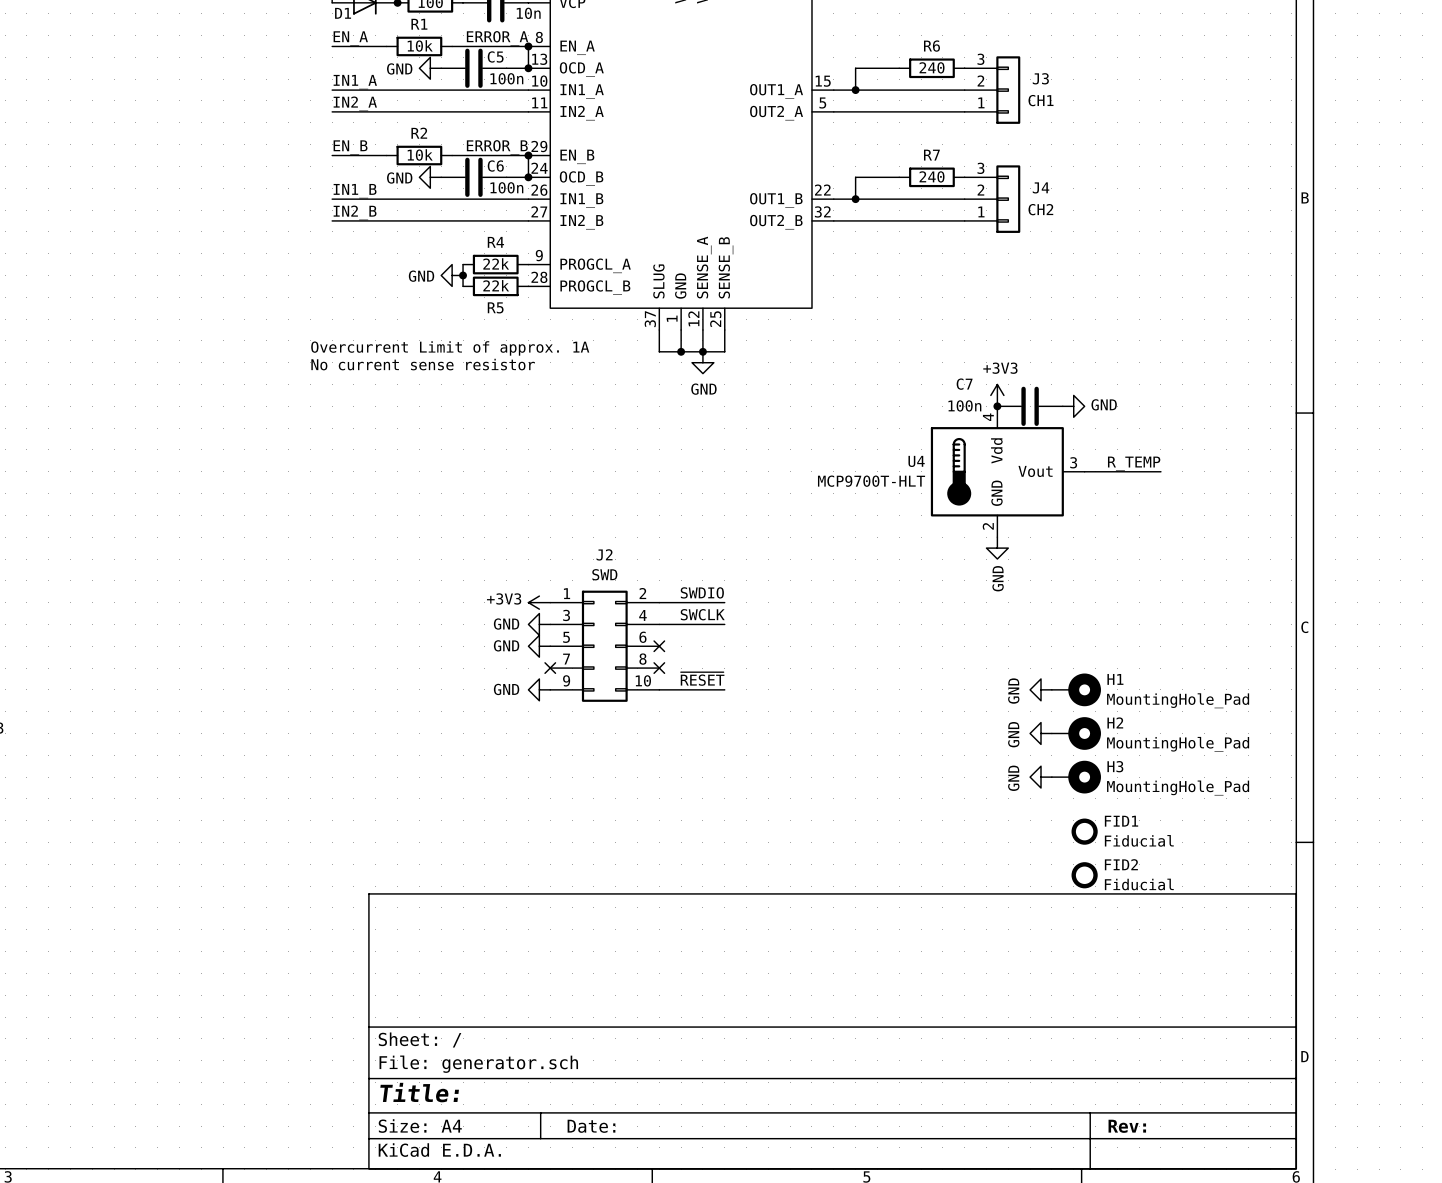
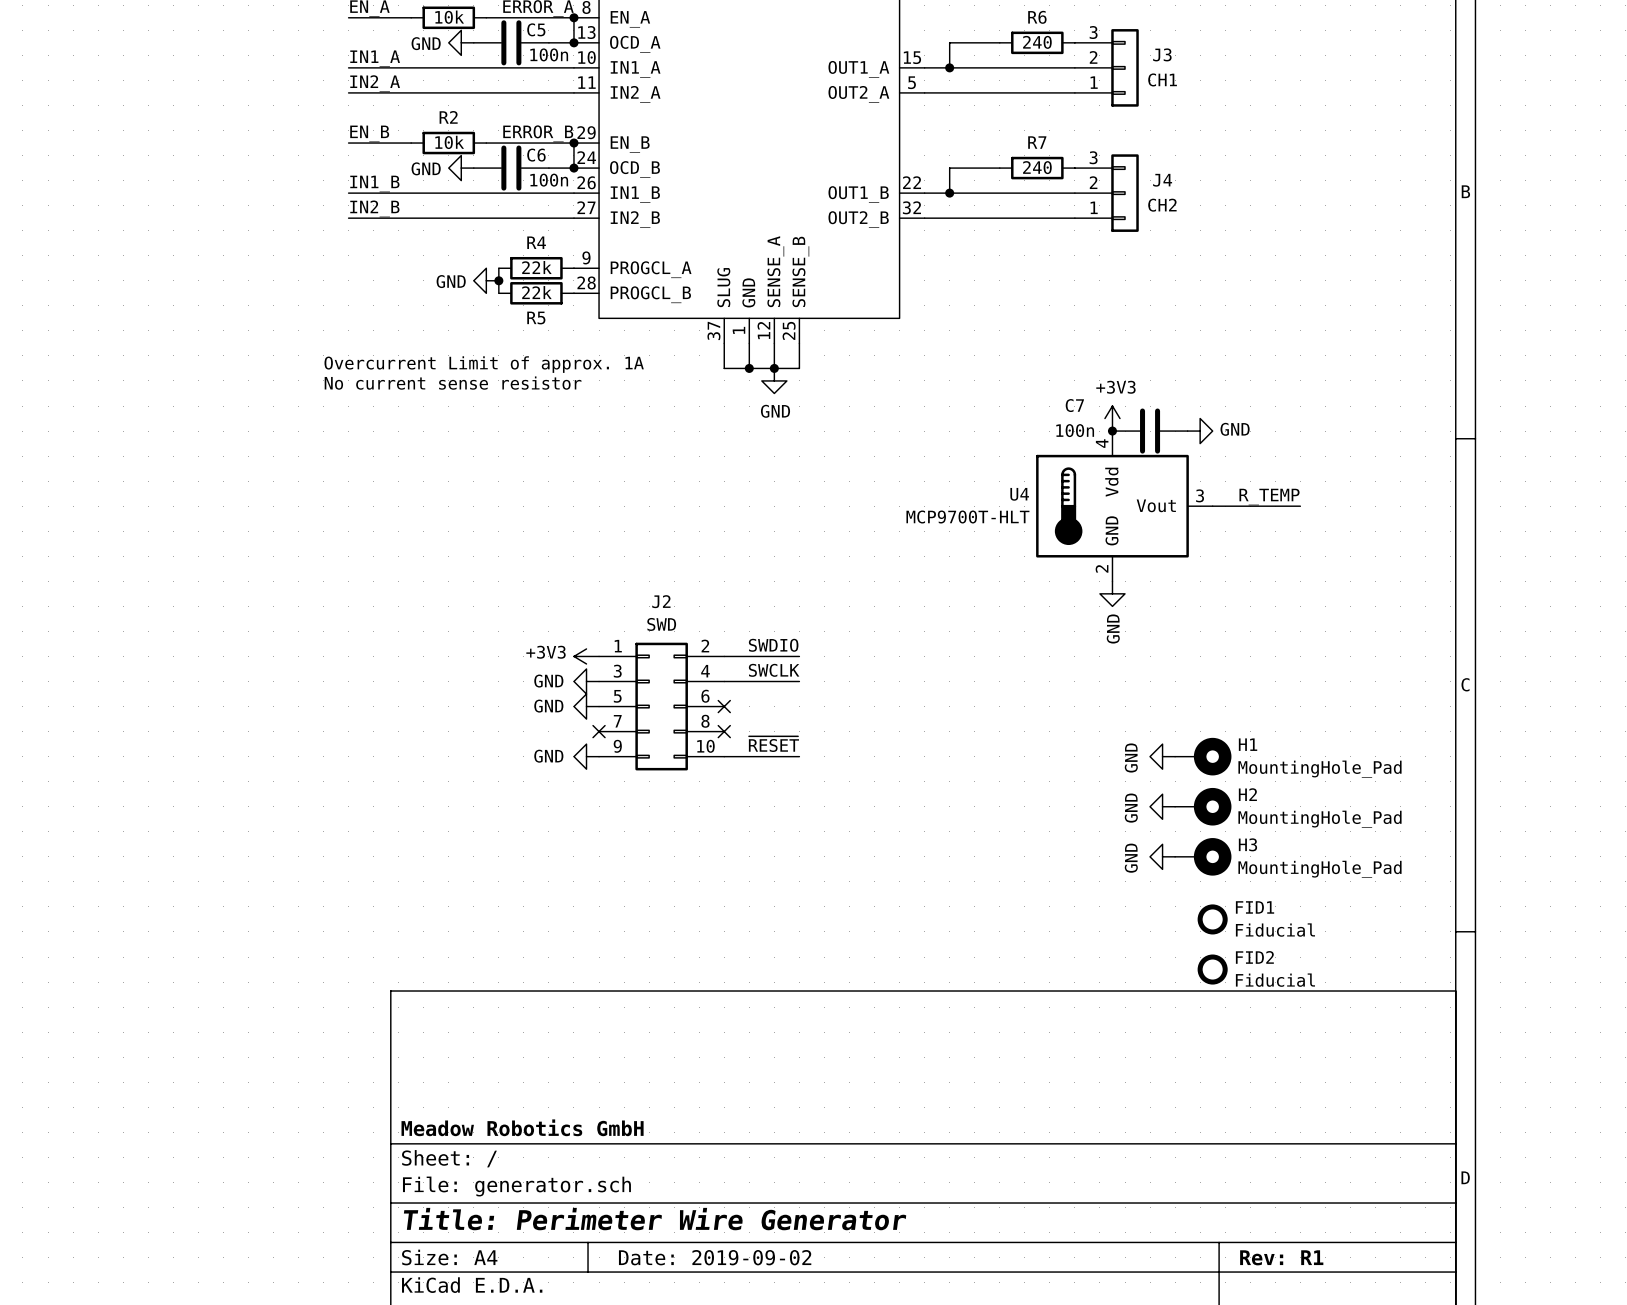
title block: none -> Meadow Robotics GmbH (522, 1127)
title block: Title: (419, 1092) -> Title: Perimeter Wire Generator (655, 1219)
title block: Date: (591, 1126) -> Date: 2019-09-02 (715, 1257)
title block: Rev: (1127, 1126) -> Rev: R1 (1281, 1257)

